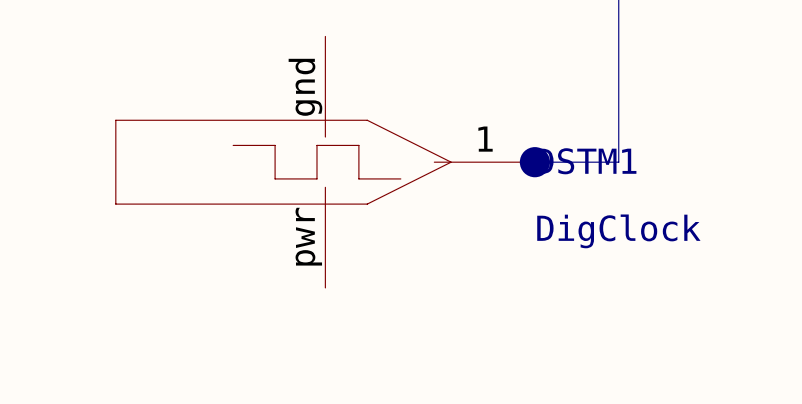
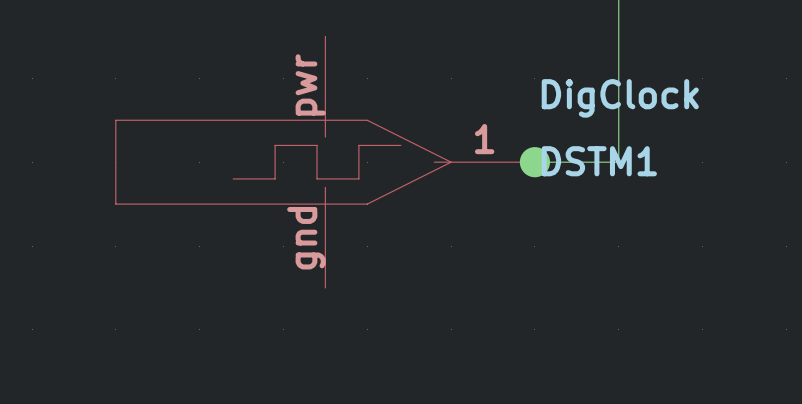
DSTM1 flip: as is (283, 162) -> up-down (283, 162)

